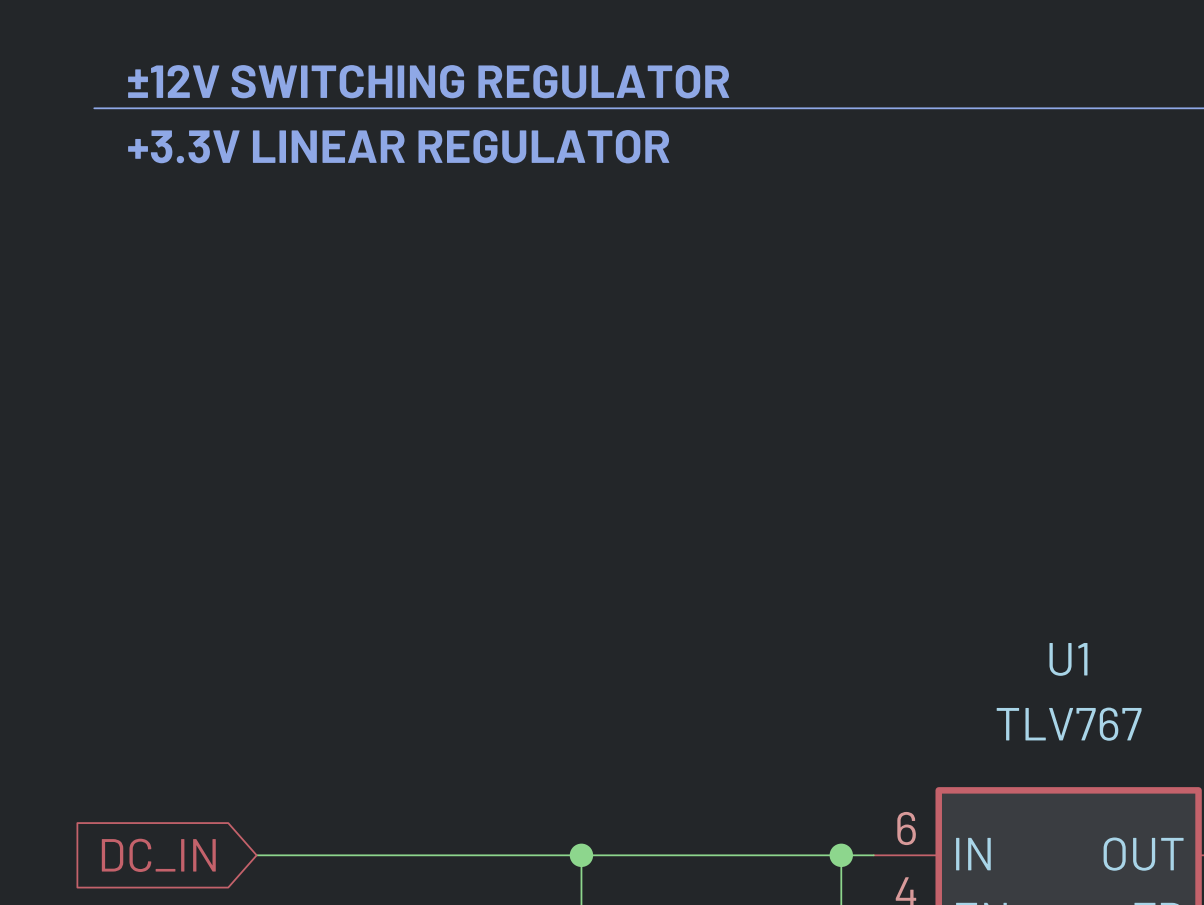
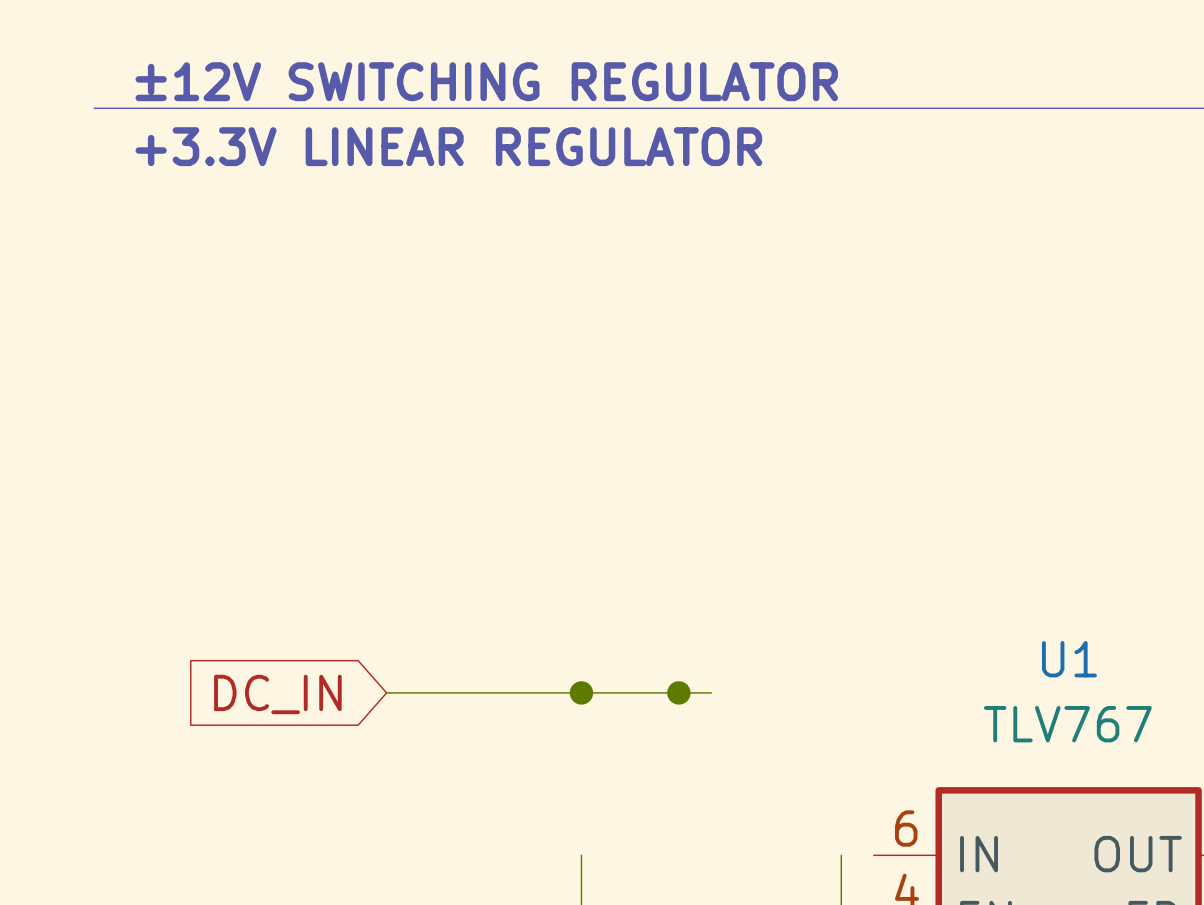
wire: none -> (386, 692) (711, 692)
junction: none -> (581, 692)
junction: none -> (678, 692)
global label position: DC_IN (158, 855) -> DC_IN (277, 694)
wire: (256, 855) (873, 855) -> none
junction: (581, 855) -> none
junction: (841, 855) -> none

